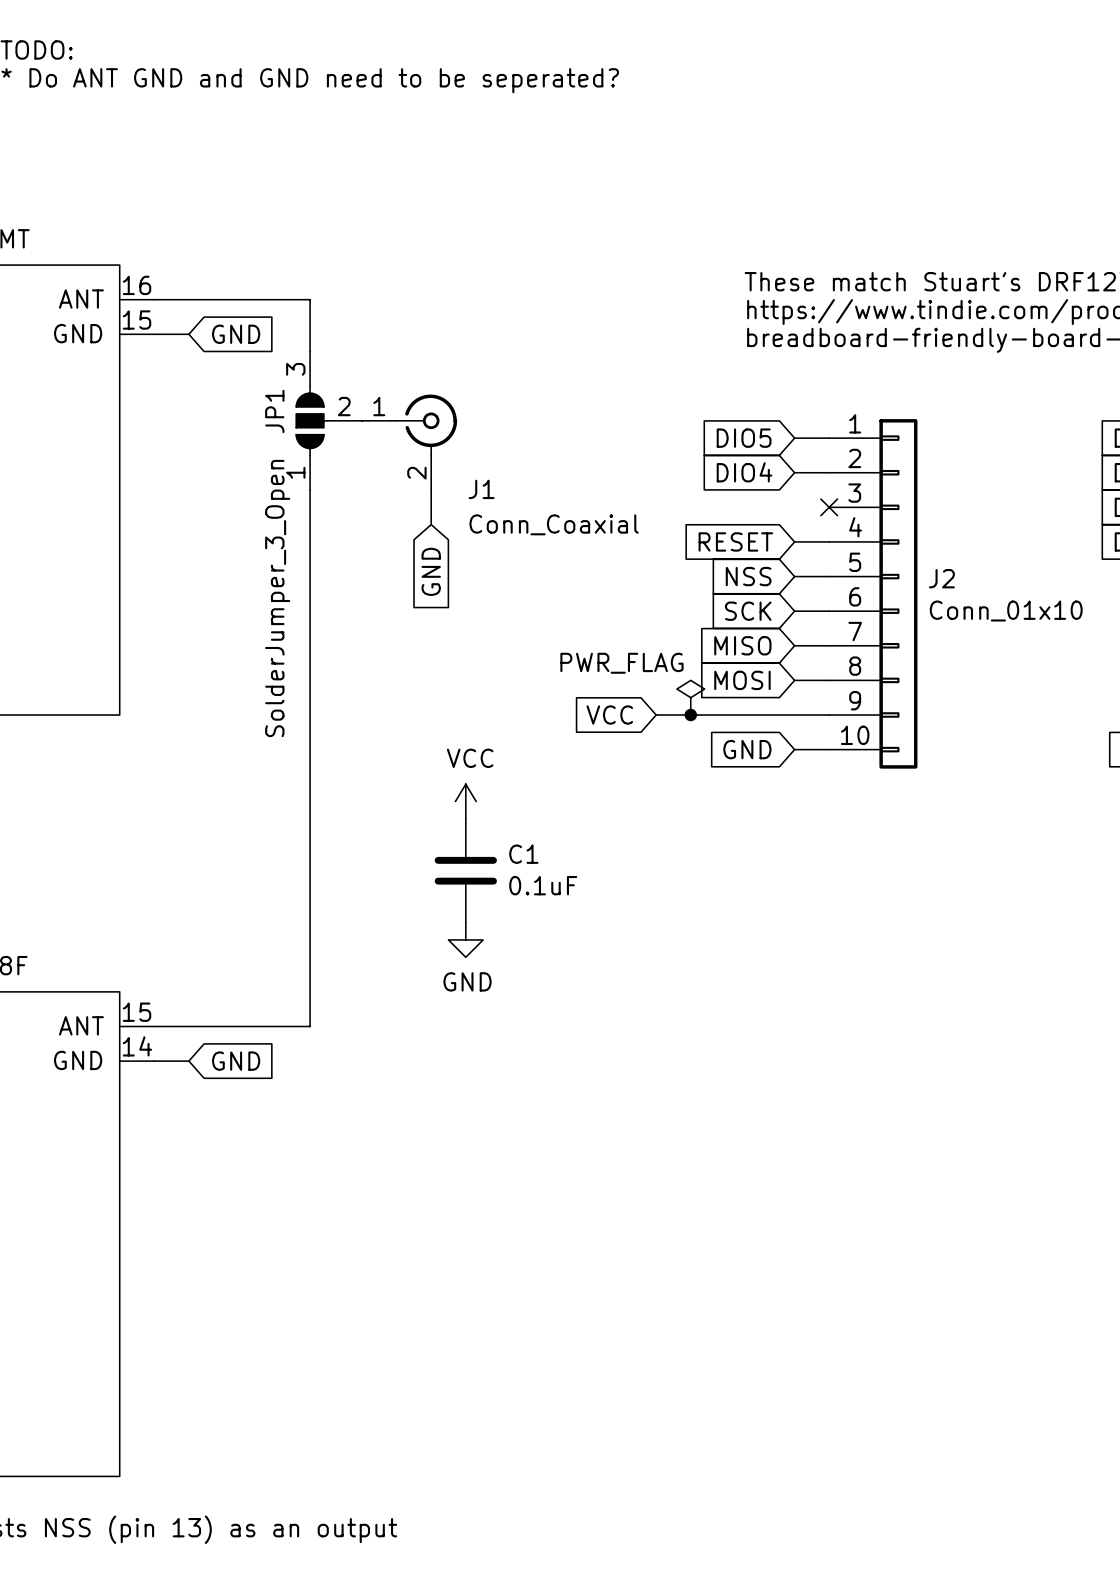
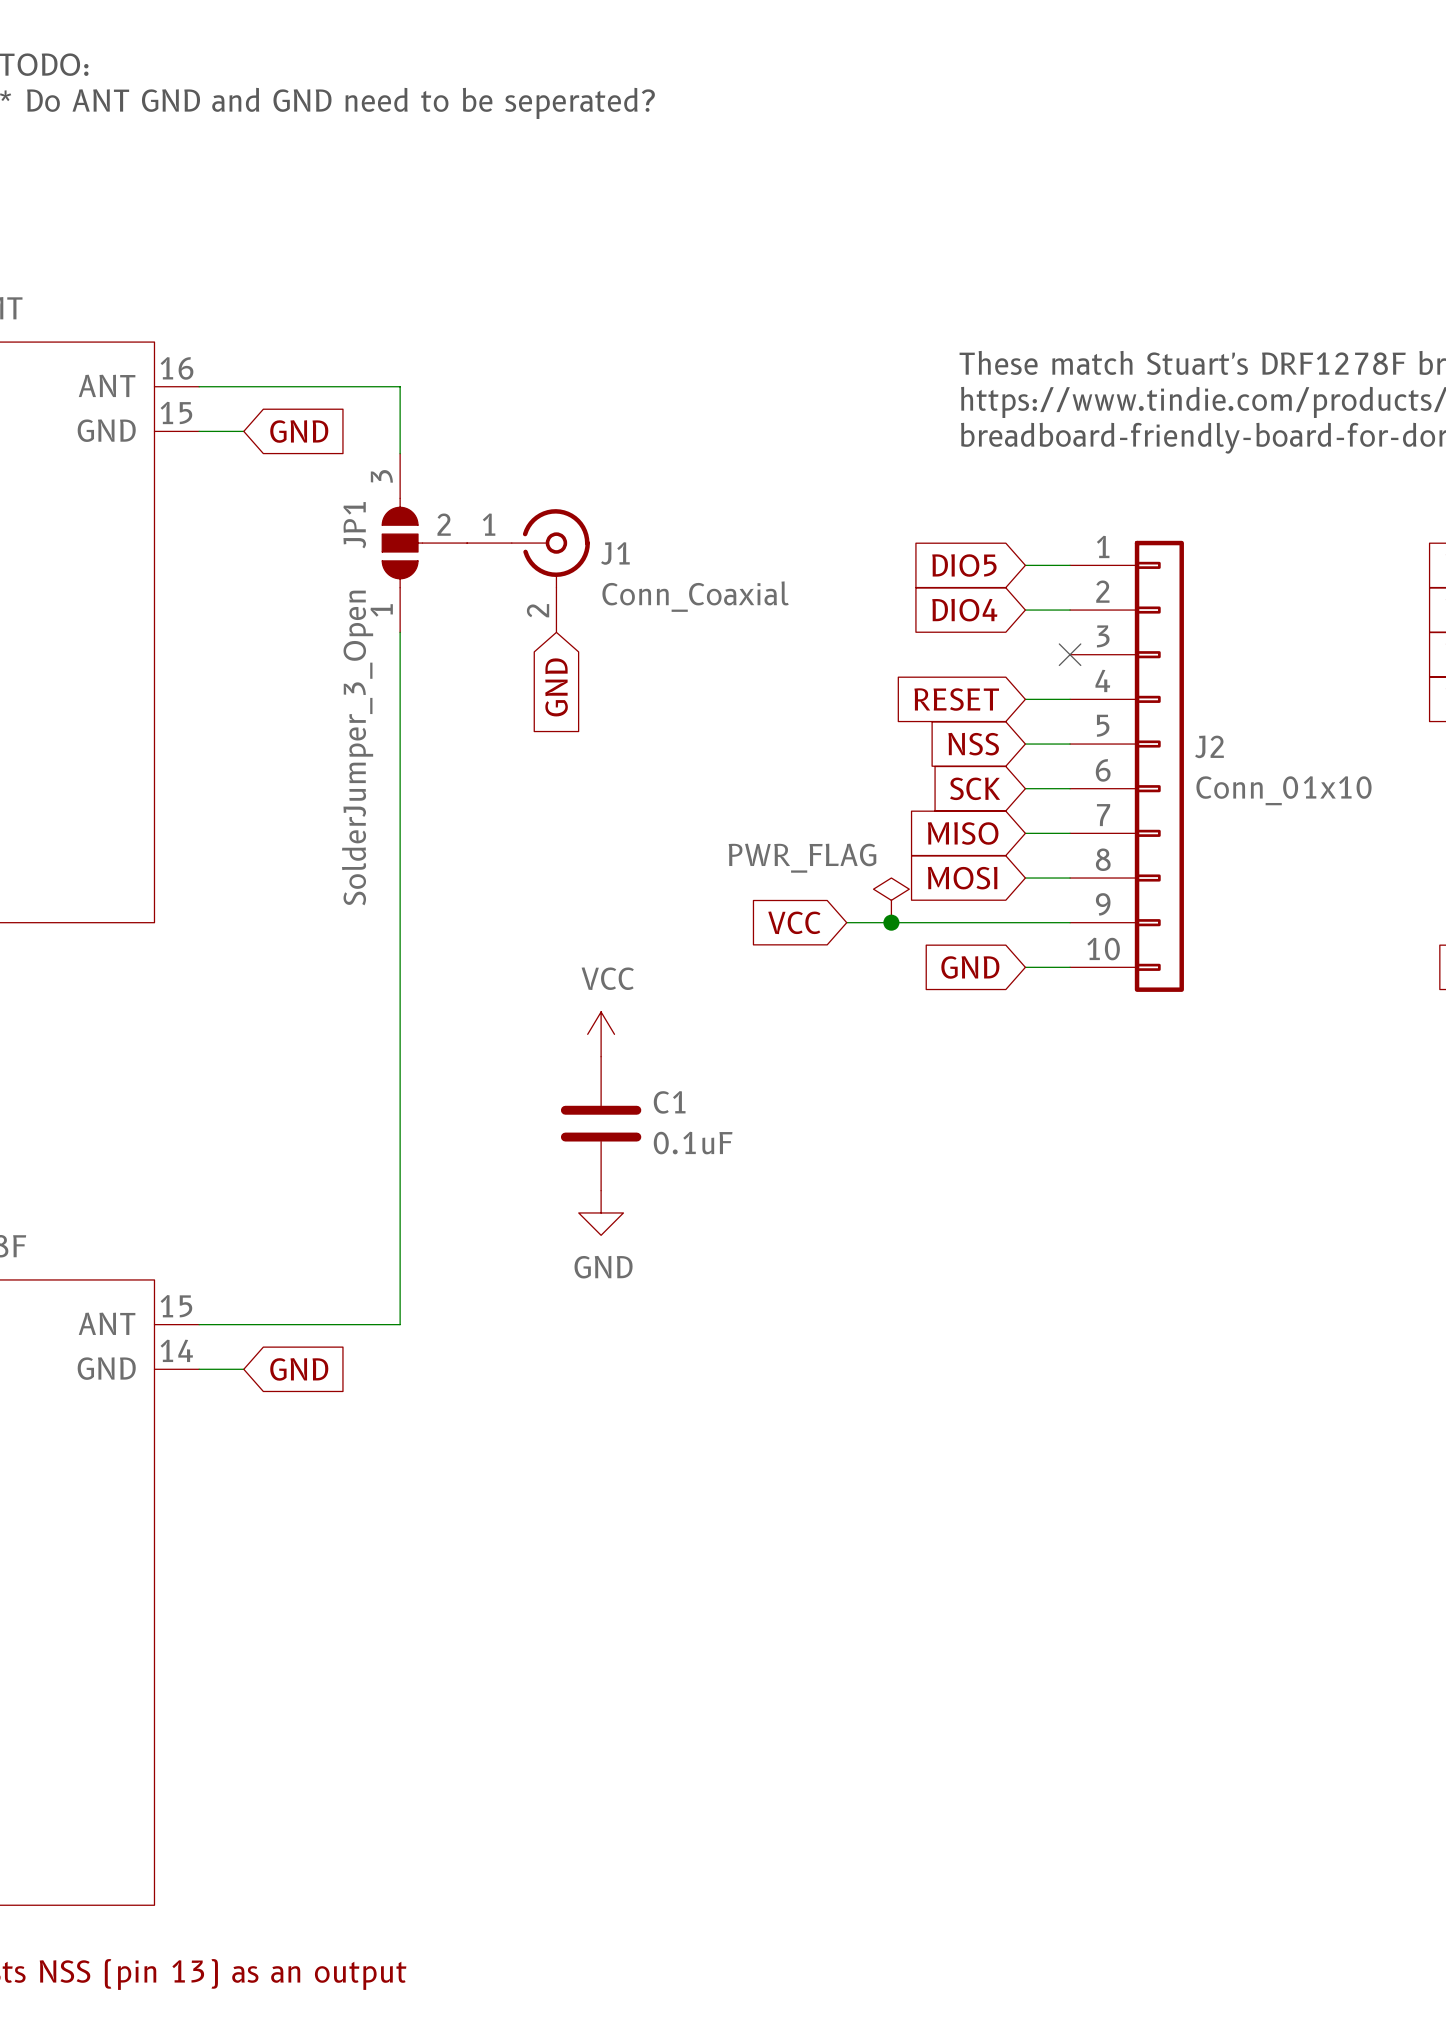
J1 name position: J1 (481, 489) -> J1 (615, 553)
wire: (431, 490) (431, 524) -> none
J1 value position: Conn_Coaxial (554, 524) -> Conn_Coaxial (695, 596)
global label position: GND (431, 571) -> GND (556, 687)

